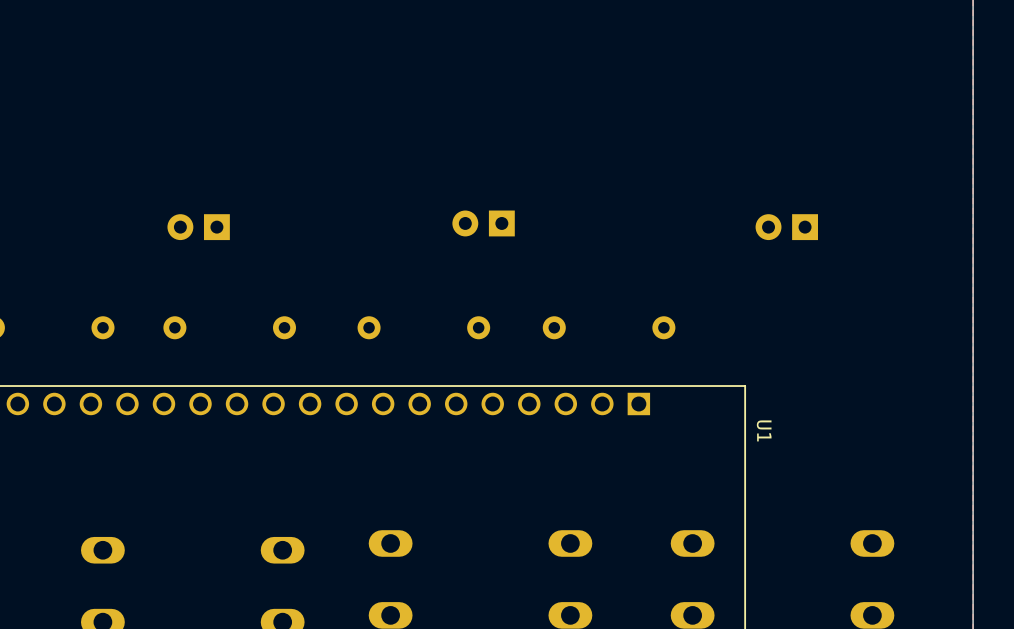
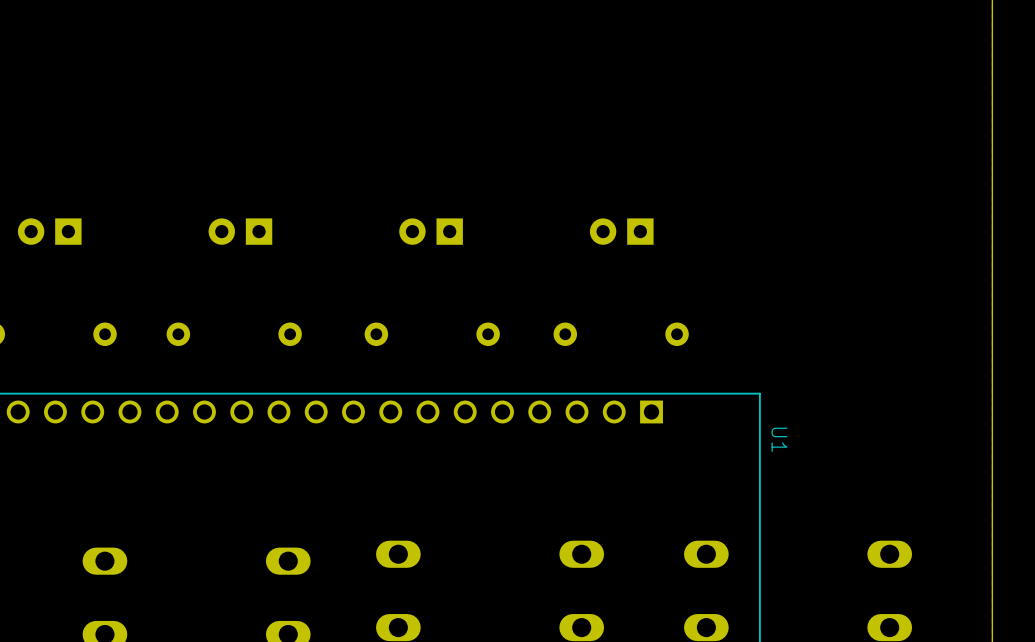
part position: (483, 223) -> (431, 231)
part: none -> (49, 231)
part position: (198, 227) -> (240, 231)
part: none -> (621, 231)
part: (786, 227) -> none

